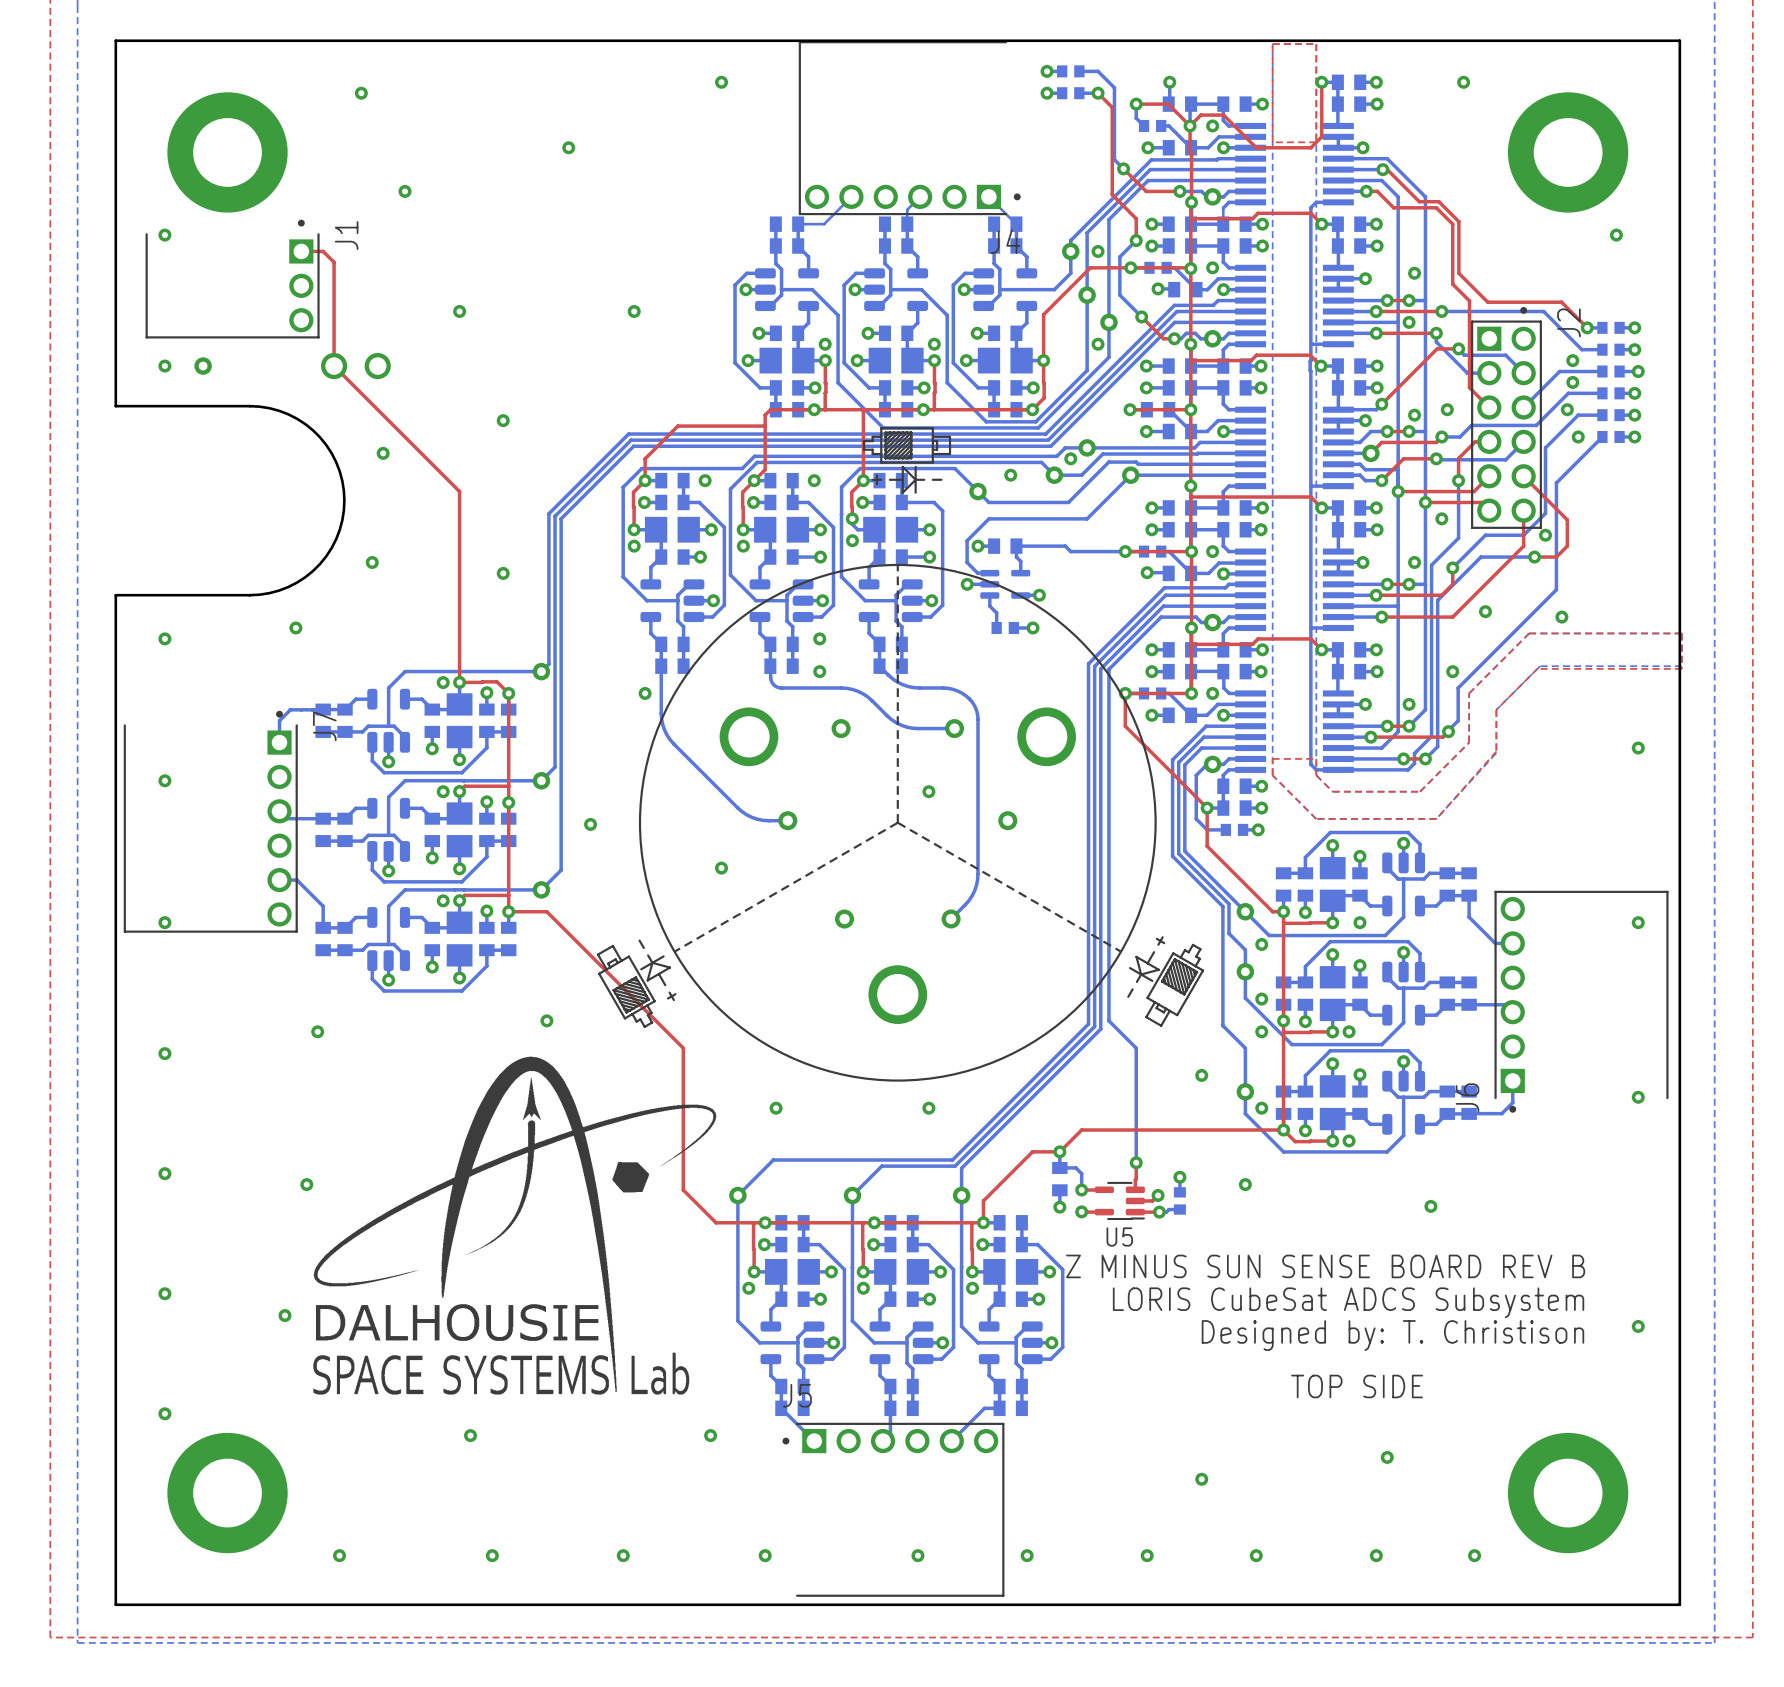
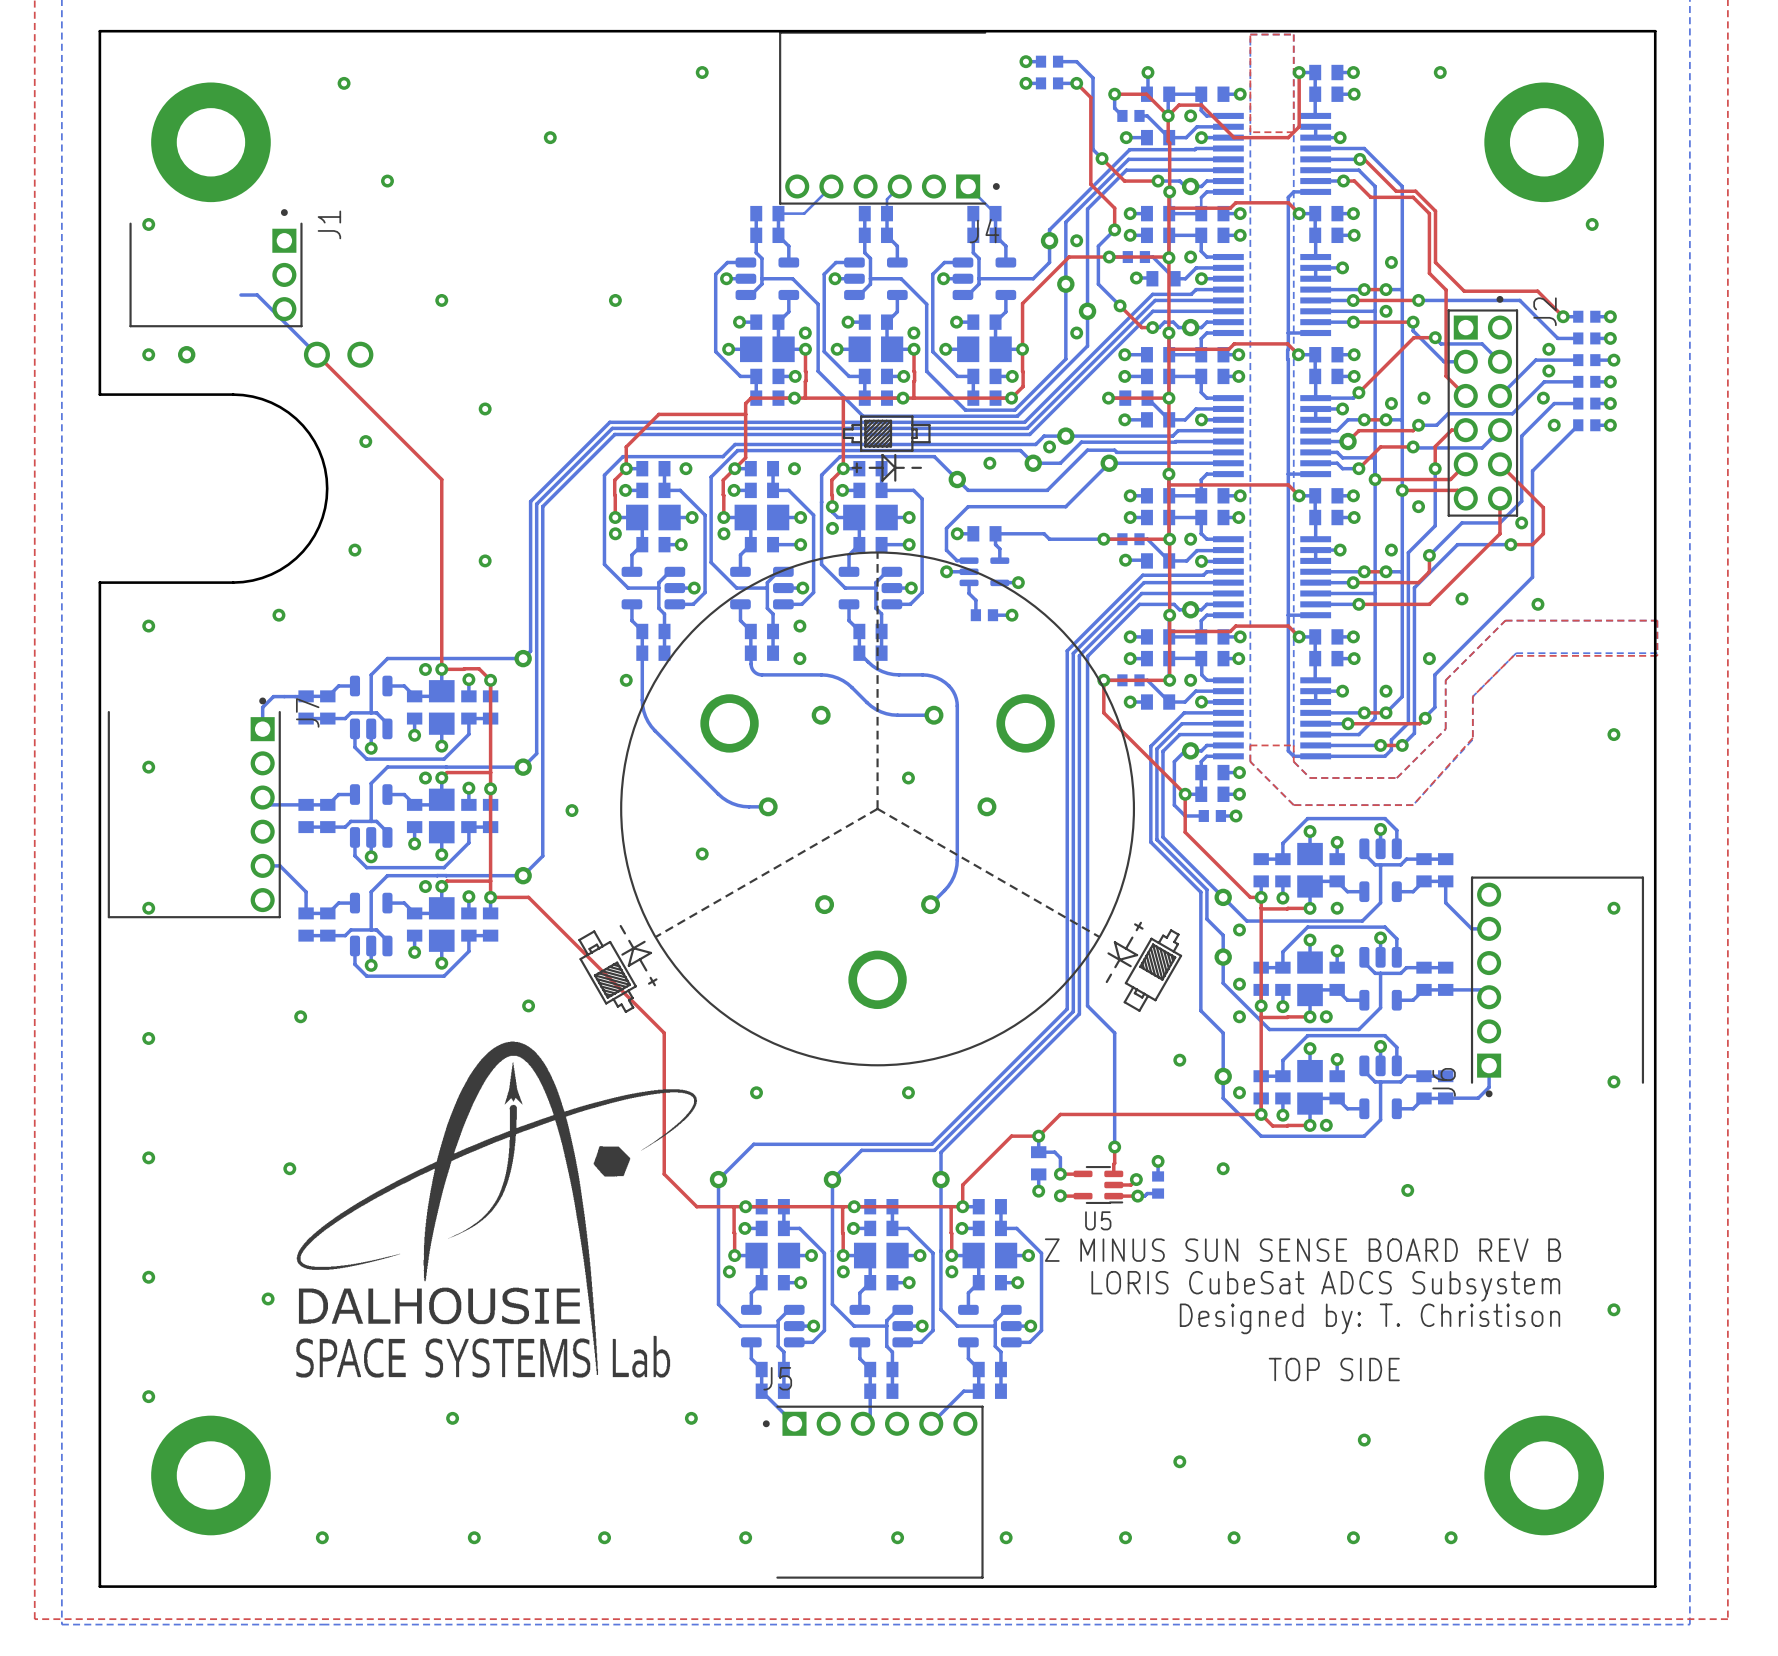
top track: (301, 251) (323, 251) (334, 262) (334, 366) -> none
bottom track: none -> (240, 295) (257, 295) (316, 354)

